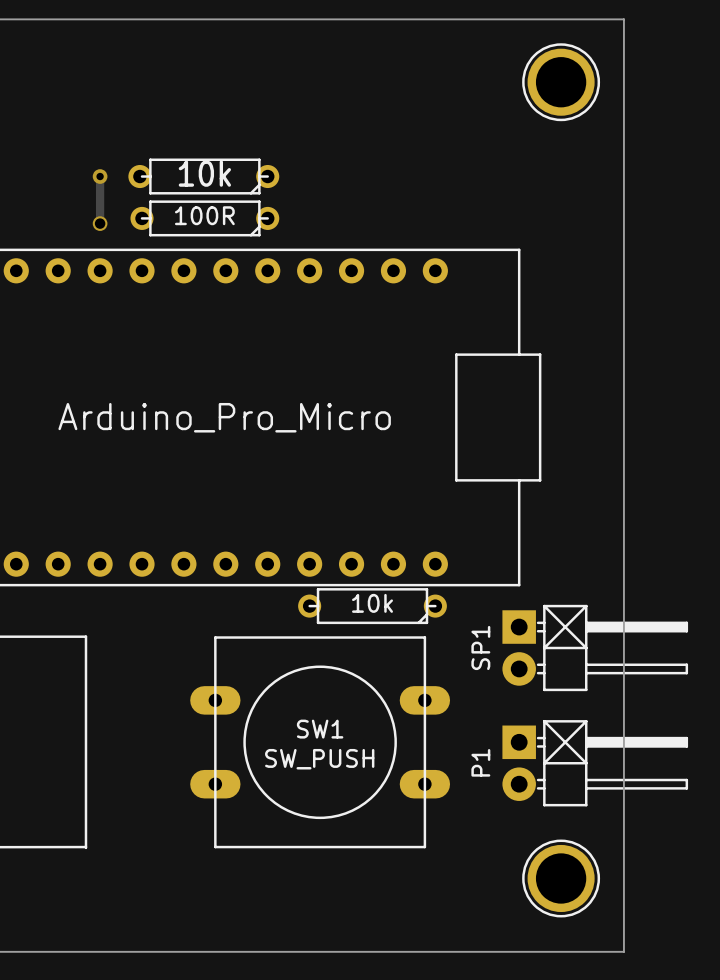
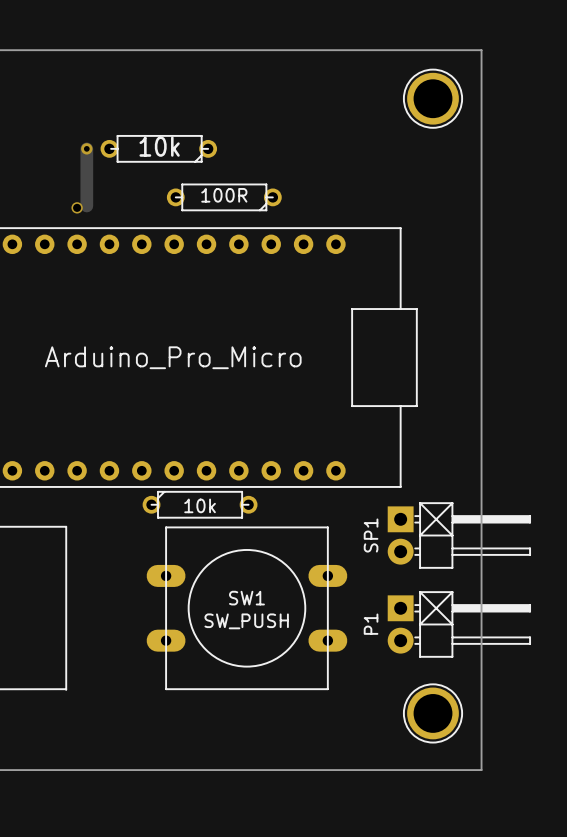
track: none -> (86, 148) (86, 205)
track: (100, 176) (100, 223) -> none
via position: (100, 176) -> (86, 148)
part position: (203, 176) -> (158, 148)
part position: (204, 218) -> (224, 197)
part rotation: 0° (372, 606) -> 180° (200, 504)
part position: (372, 606) -> (200, 504)

